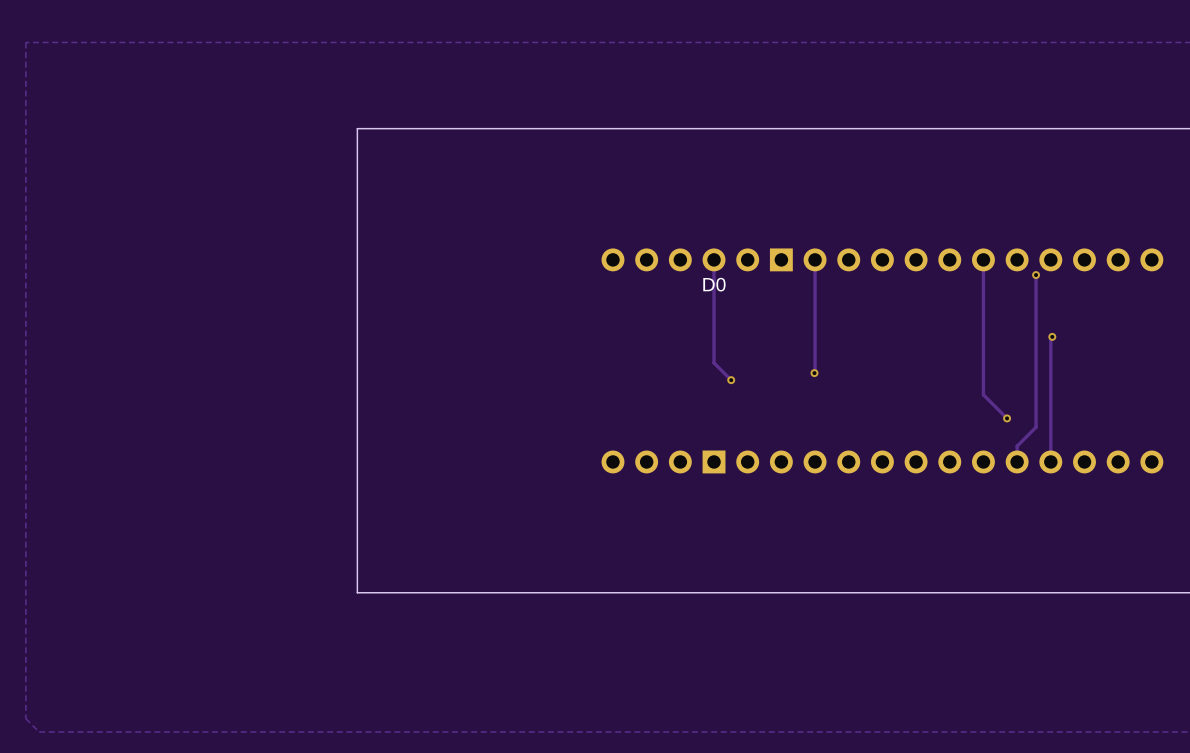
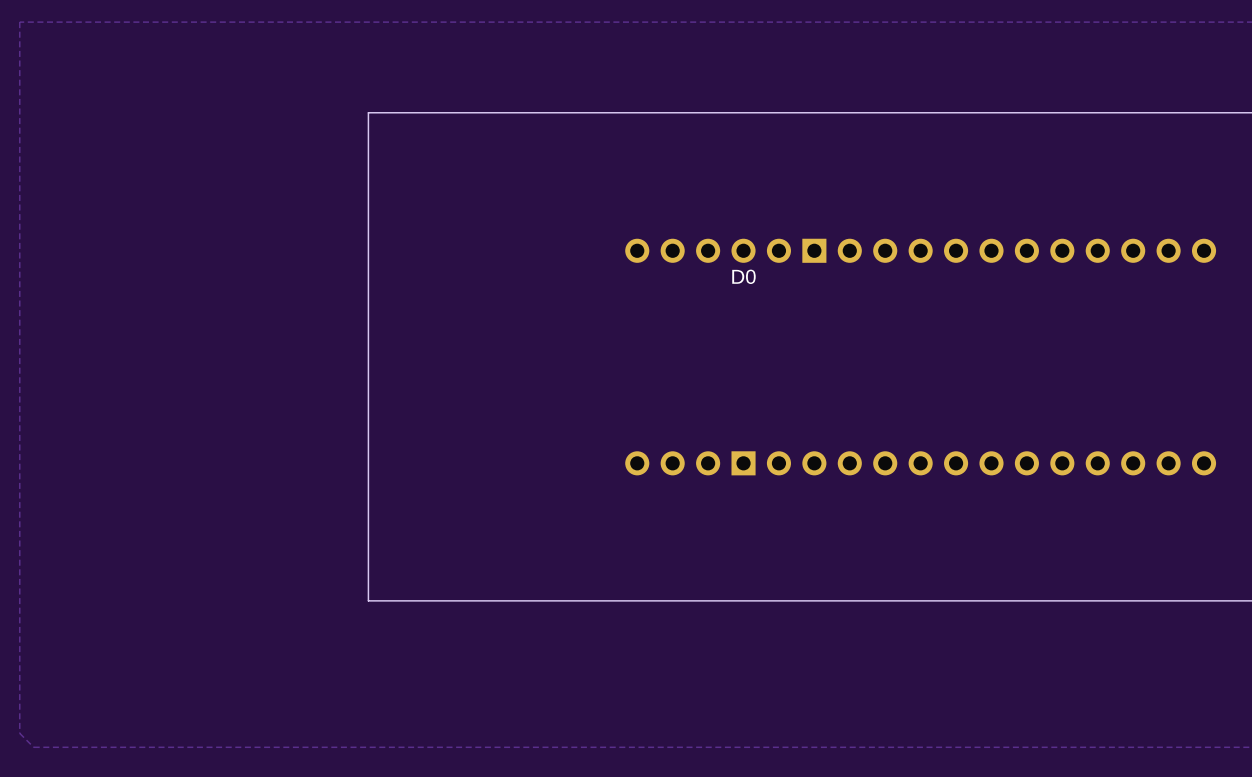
track: (714, 259) (714, 362) (731, 380) -> none
track: (815, 259) (814, 373) -> none
track: (983, 259) (983, 394) (1007, 418) -> none
track: (1036, 275) (1036, 427) (1017, 446) (1017, 461) -> none
via: (1036, 275) -> none
track: (1052, 336) (1050, 461) -> none
via: (1052, 336) -> none
via: (814, 373) -> none
via: (731, 380) -> none
via: (1007, 418) -> none

